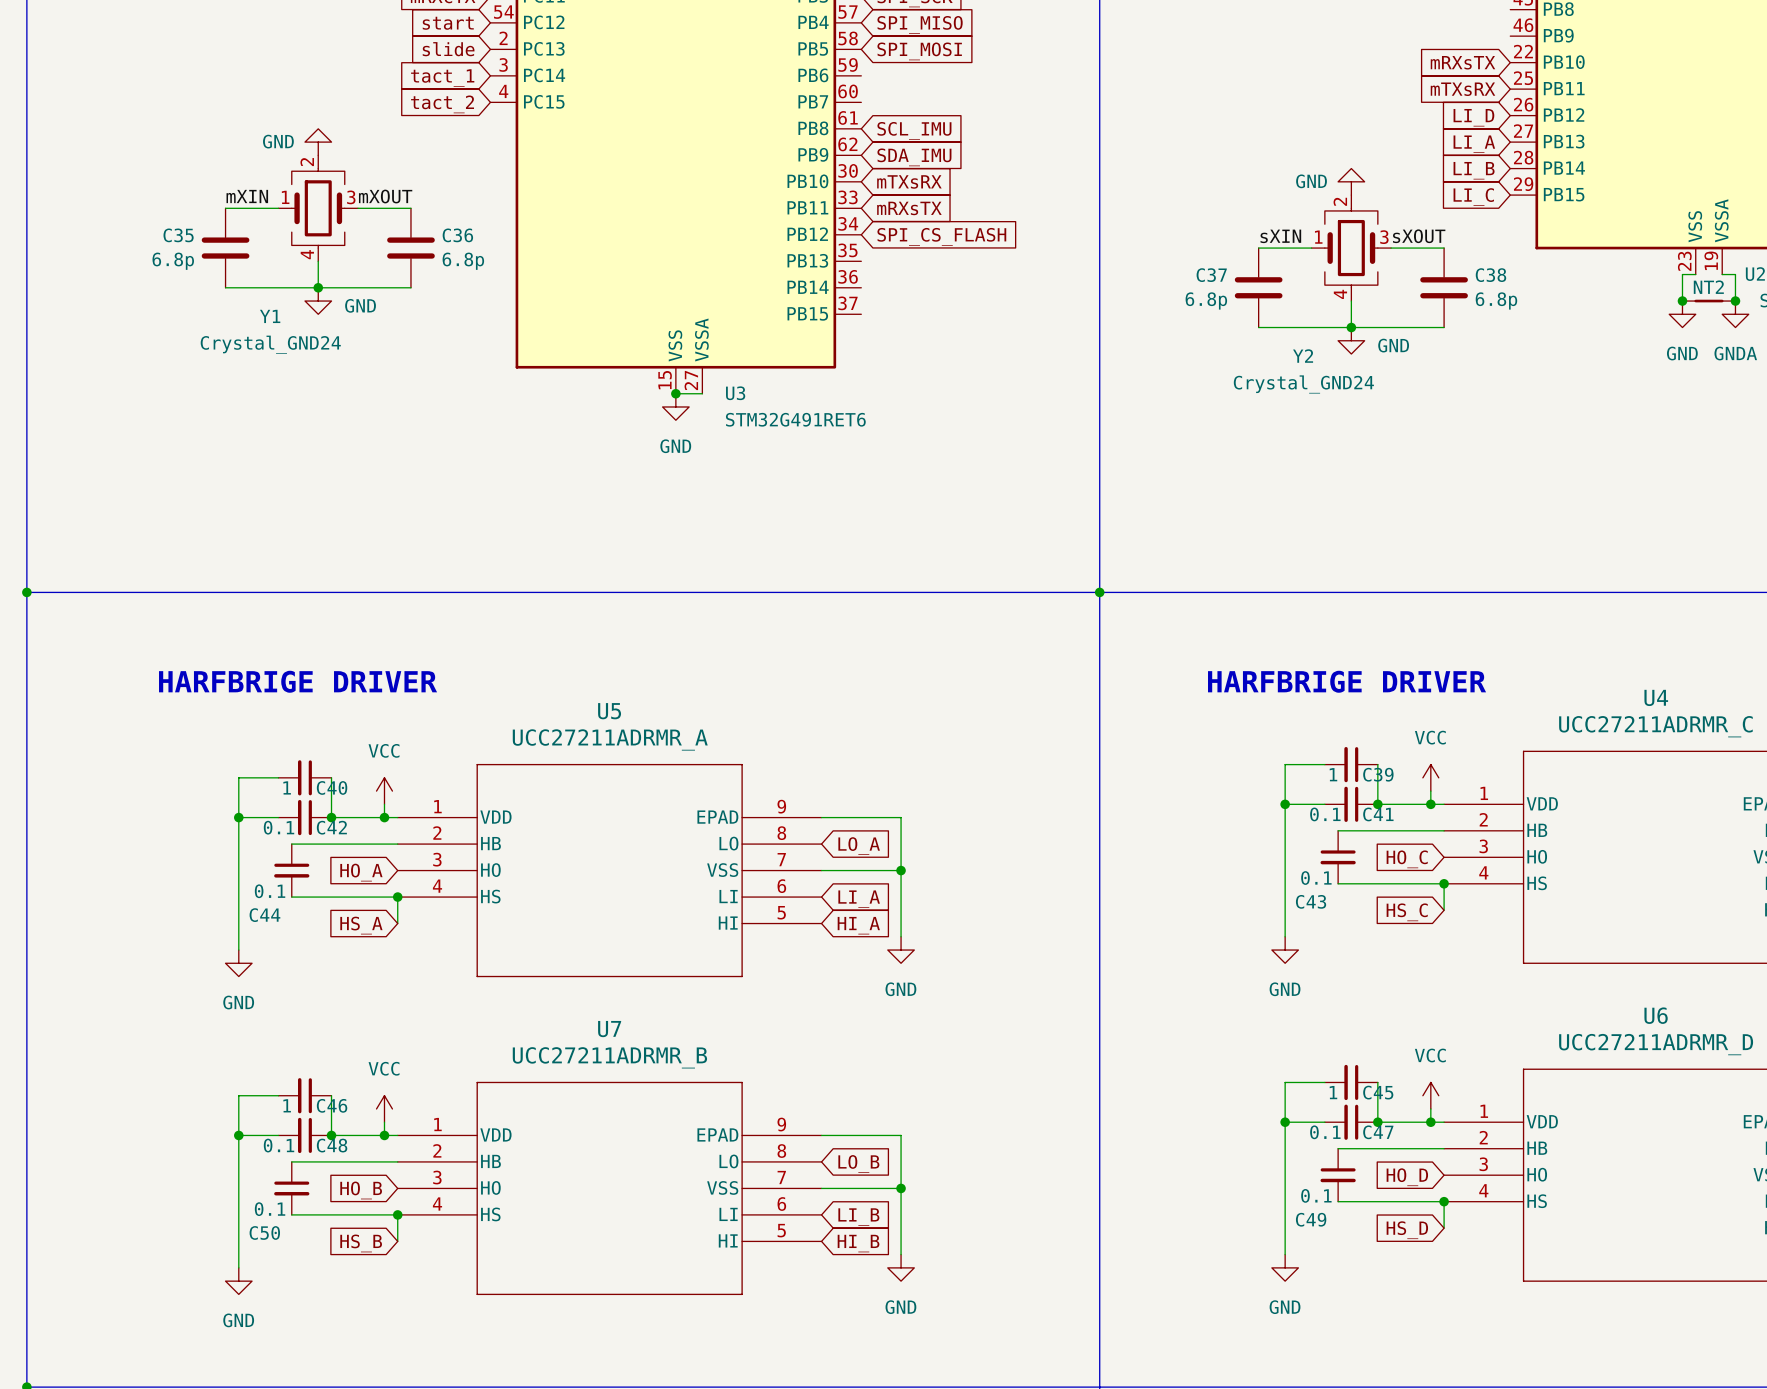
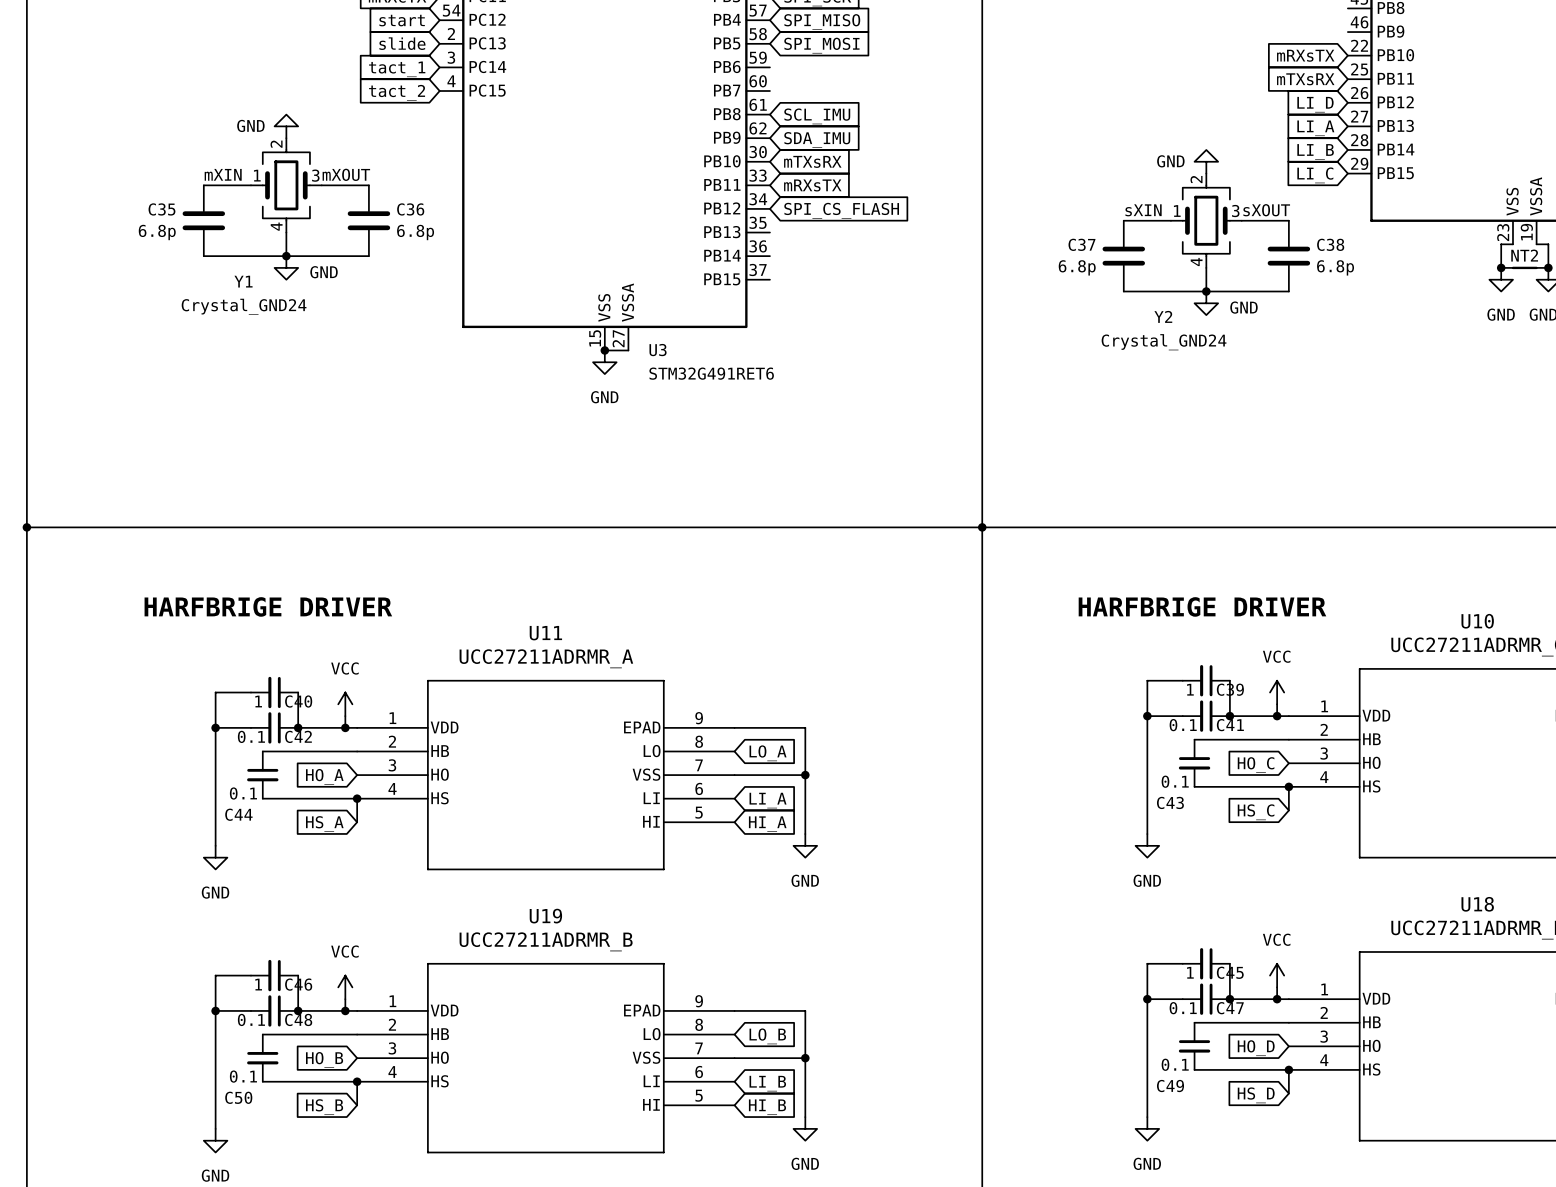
U4 name: U4 (1656, 697) -> U10 (1477, 621)
U5 name: U5 (609, 711) -> U11 (545, 633)
U6 name: U6 (1656, 1015) -> U18 (1477, 904)
U7 name: U7 (609, 1029) -> U19 (545, 916)

